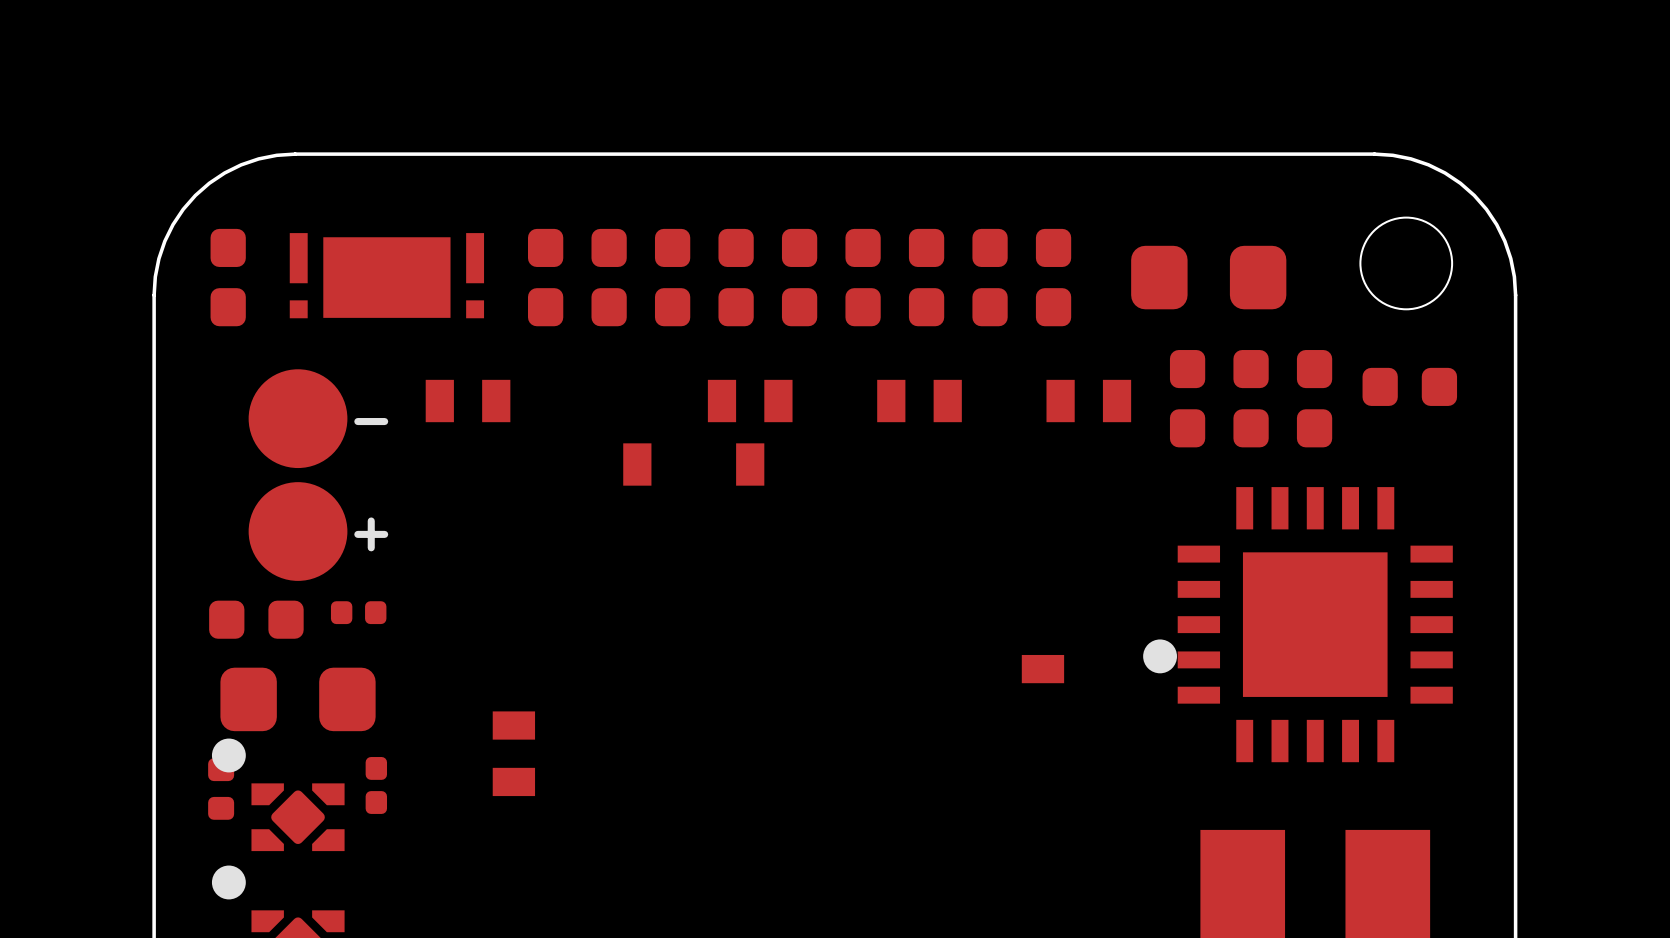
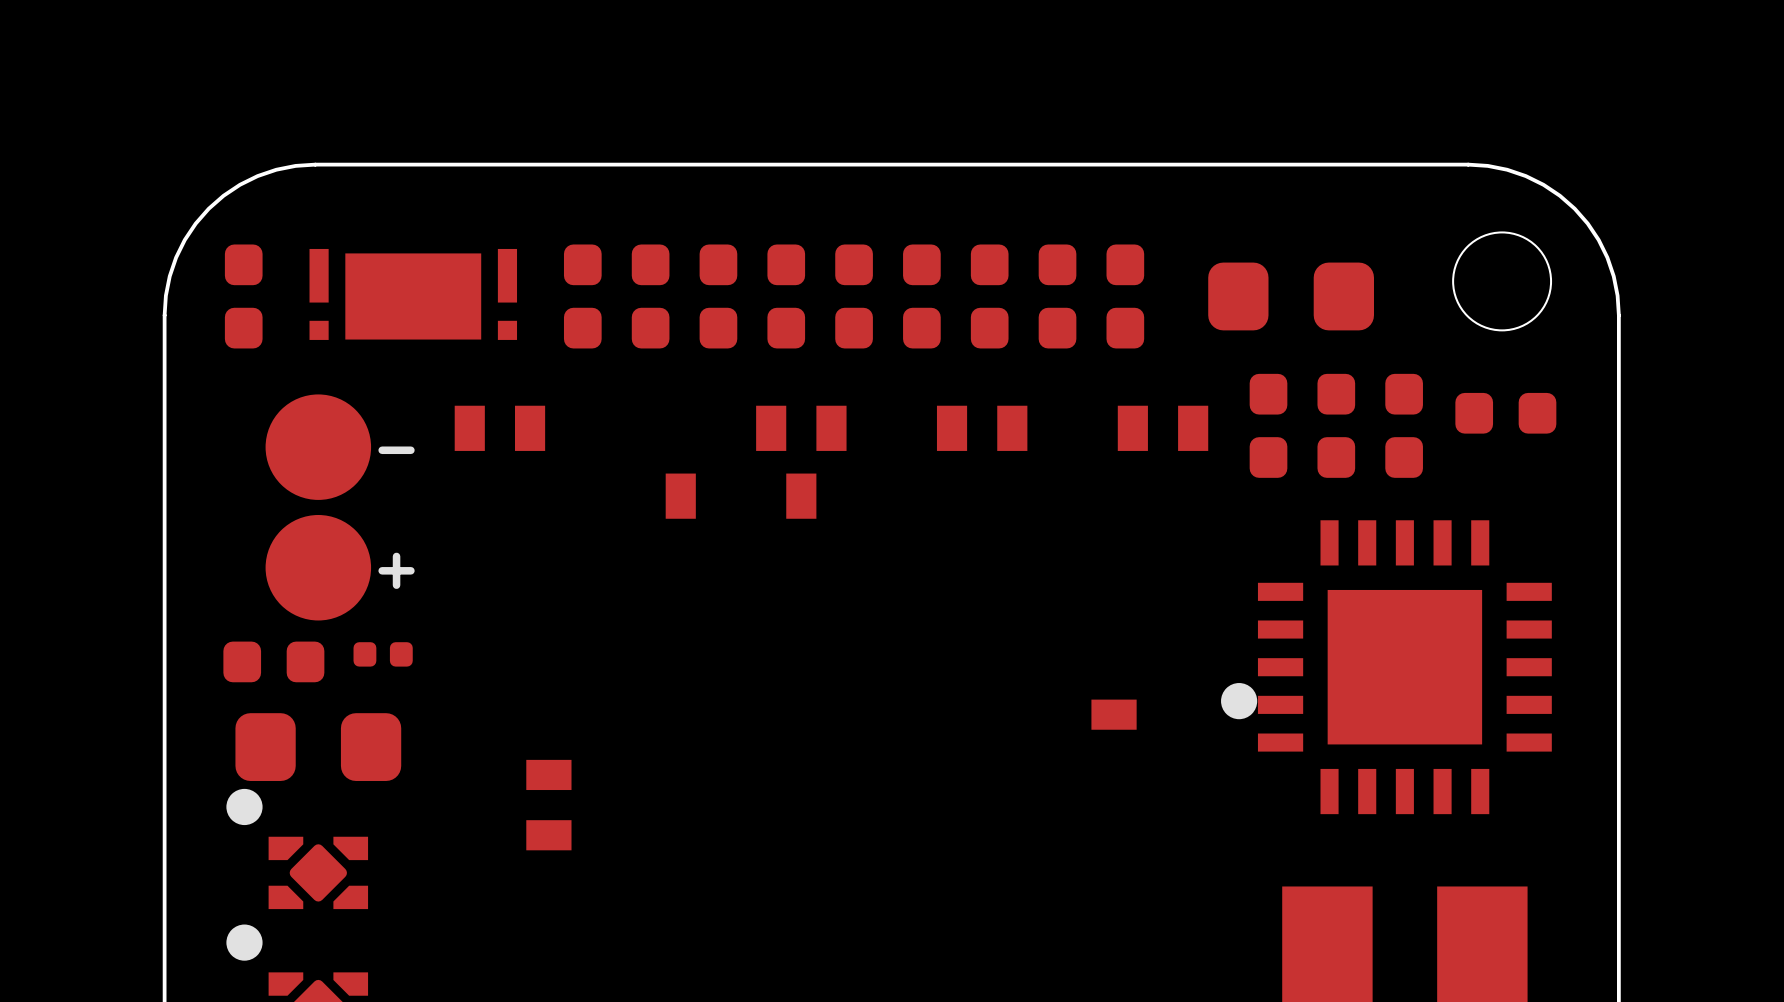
part: (376, 785) -> none
part: (221, 789) -> none

